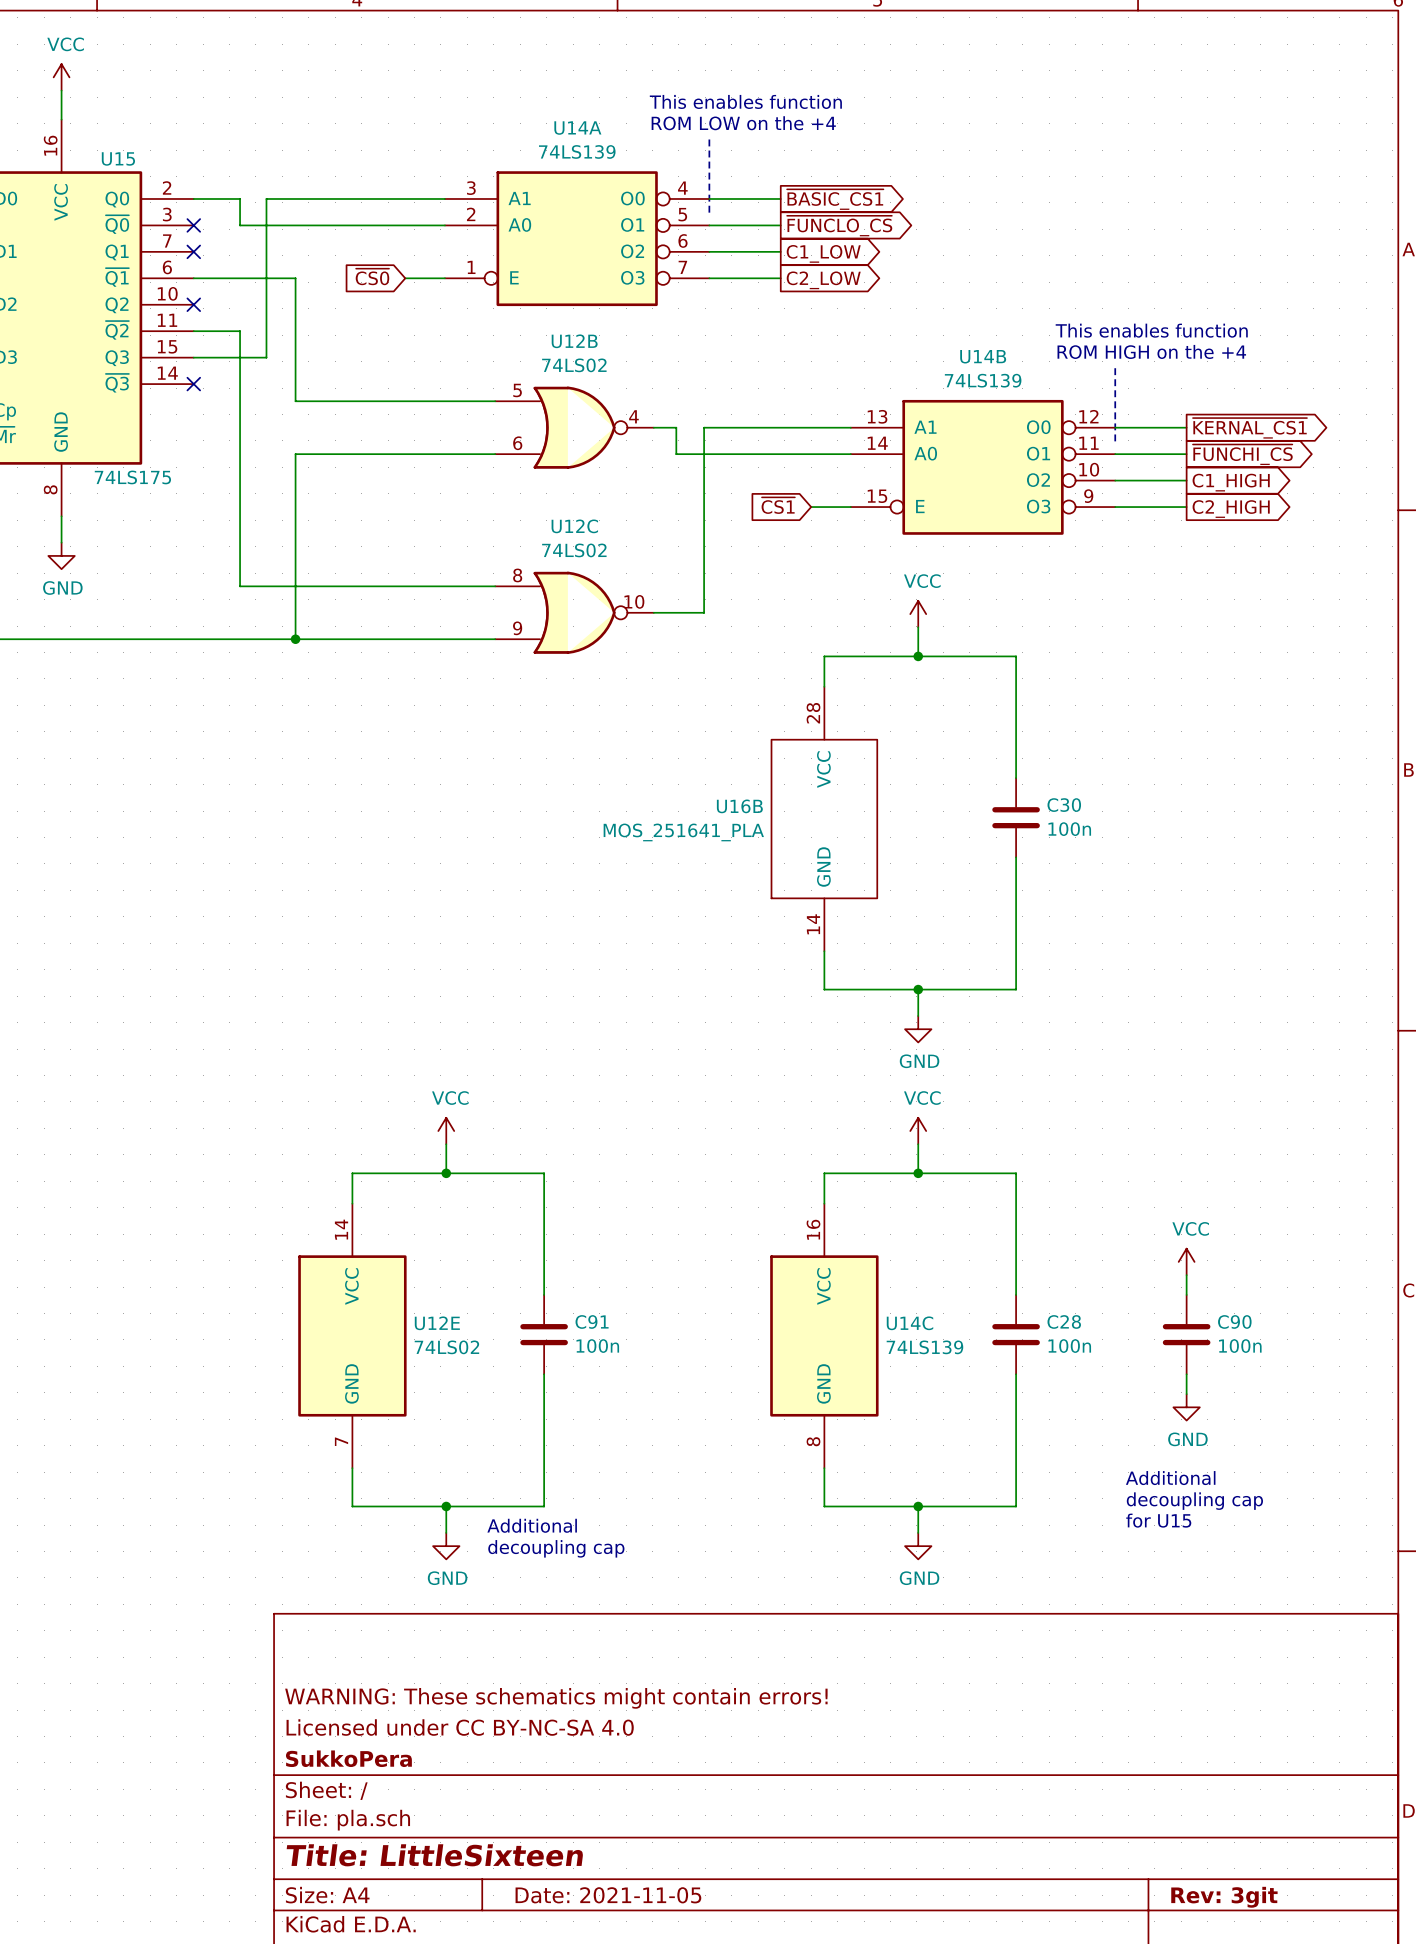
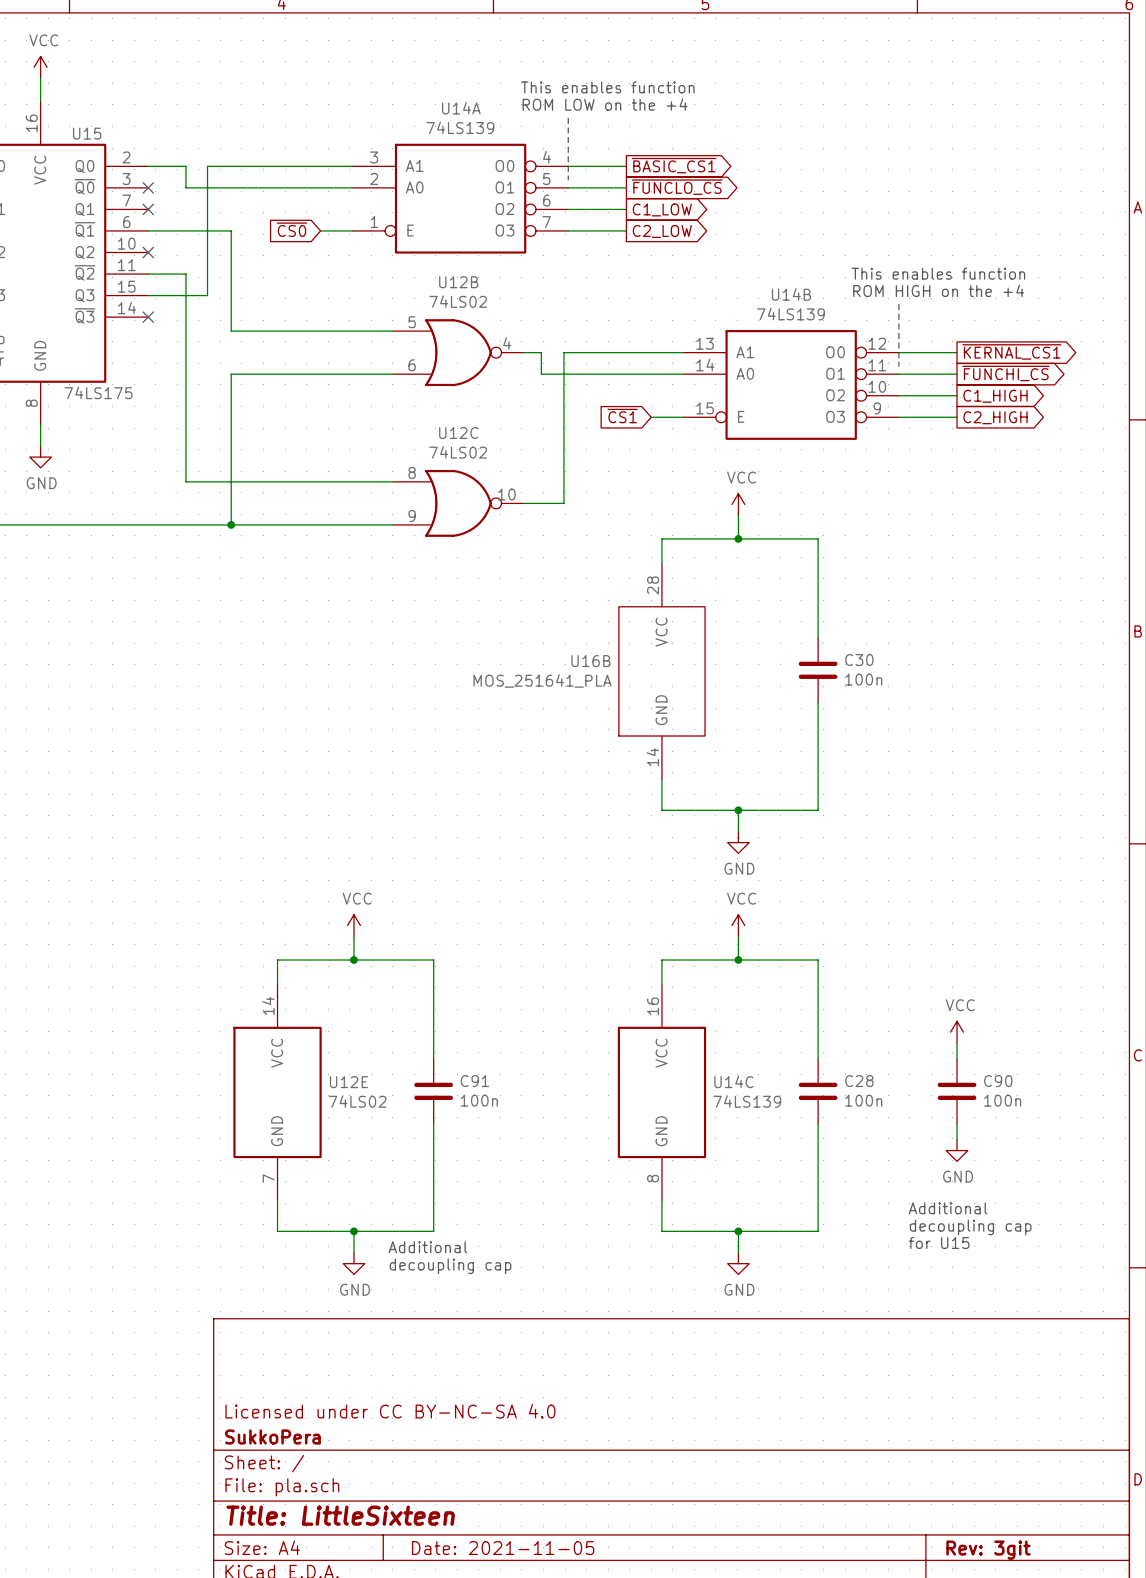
title block: WARNING: These schematics might contain errors! (556, 1698) -> none

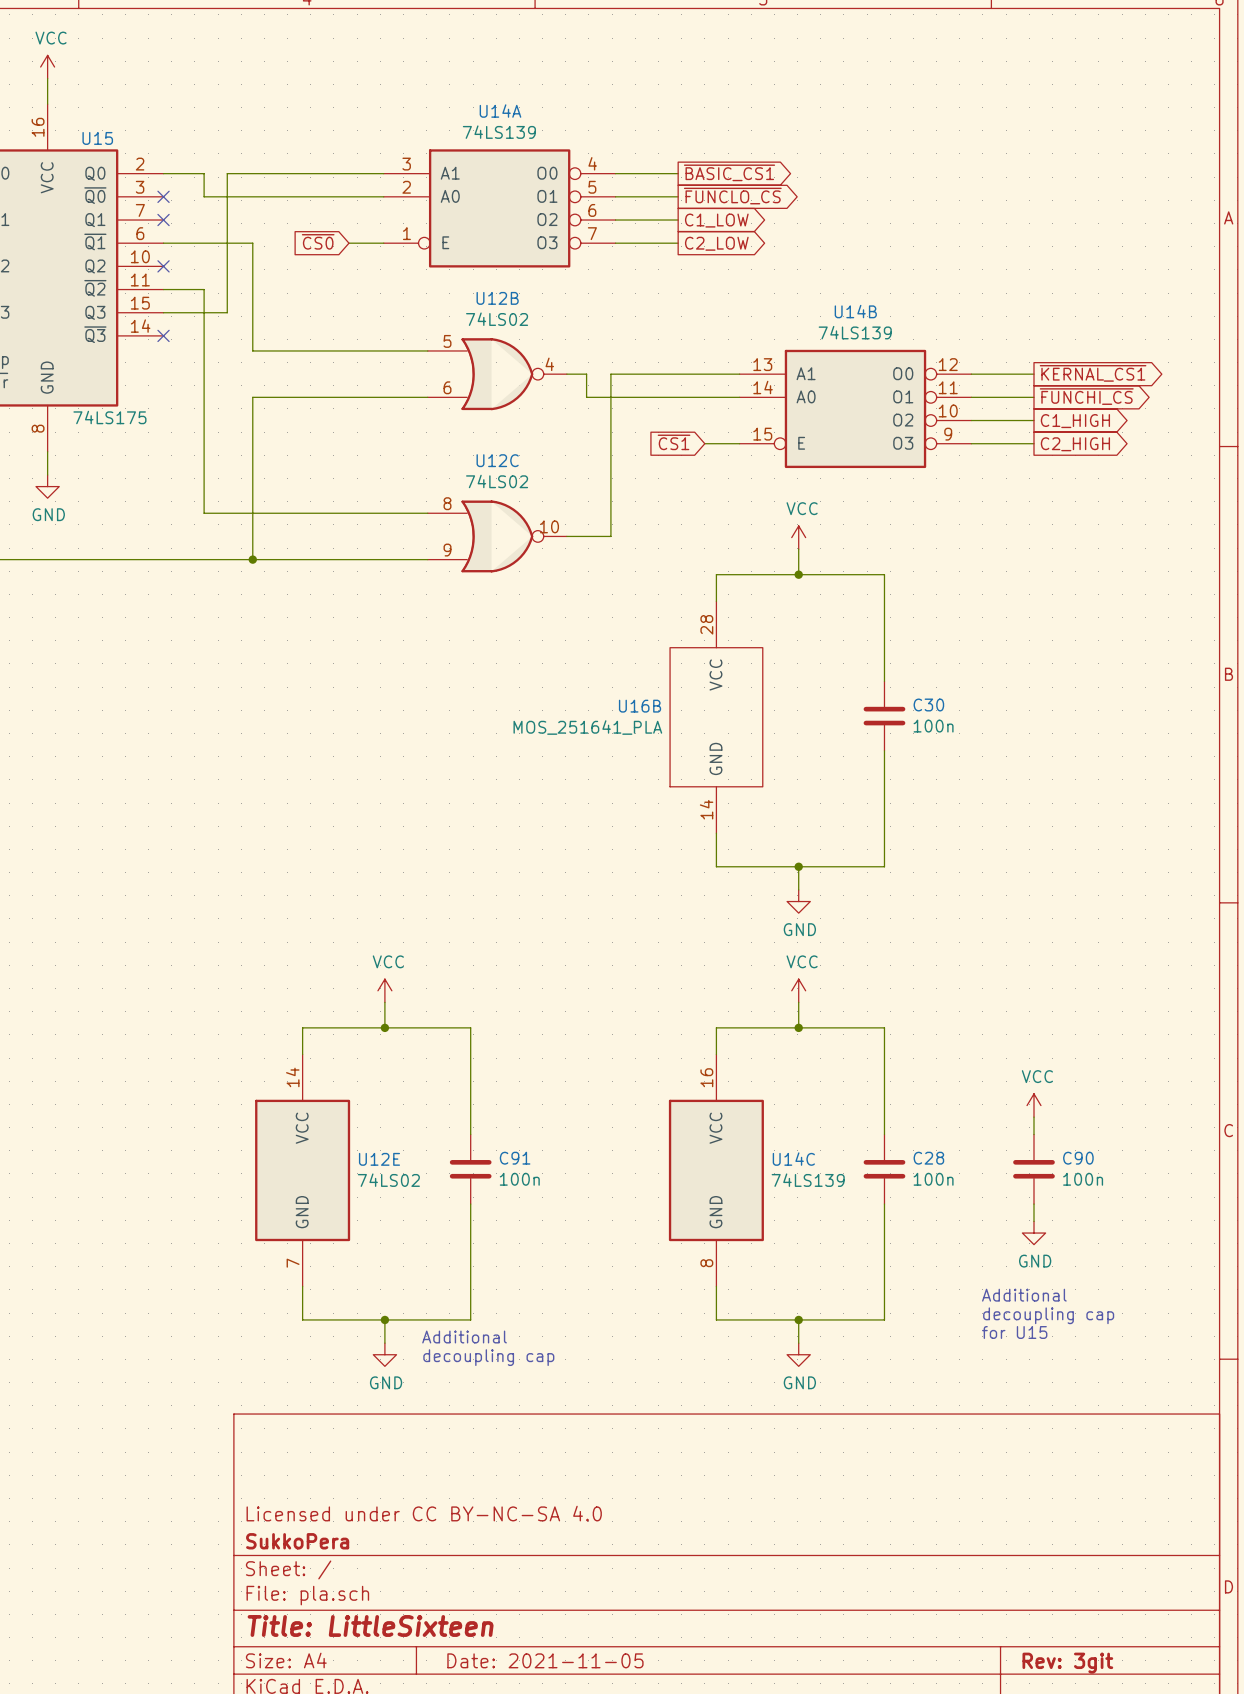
text: This enables function (607, 87) -> none
text: ROM LOW on the +4 (605, 104) -> none
line: (568, 117) (568, 180) -> none
text: This enables function (938, 273) -> none
text: ROM HIGH on the +4 (938, 290) -> none
line: (898, 304) (898, 366) -> none

